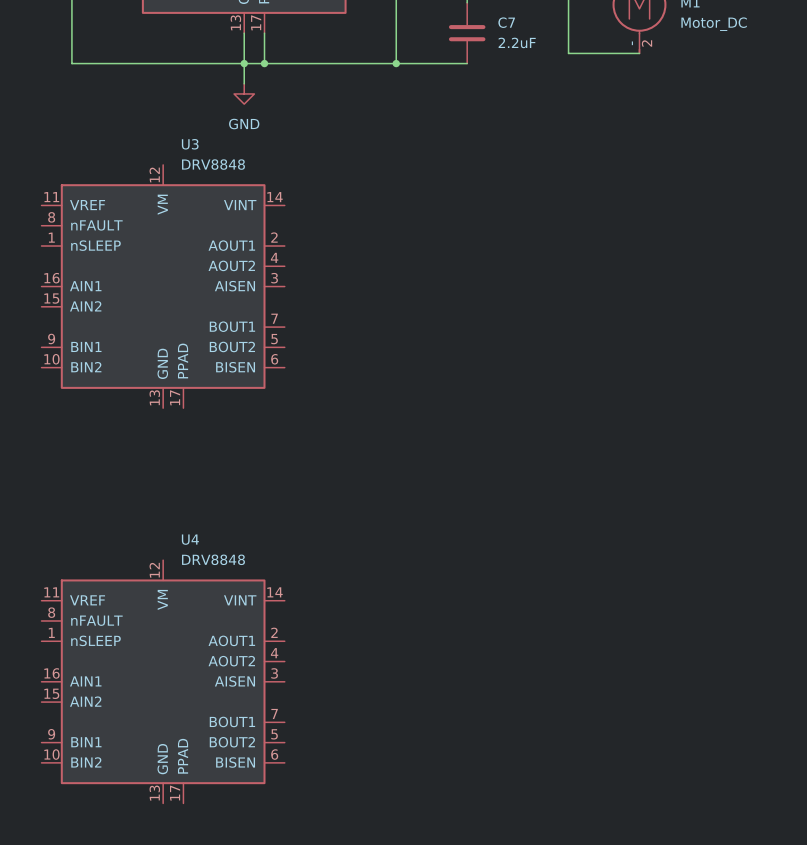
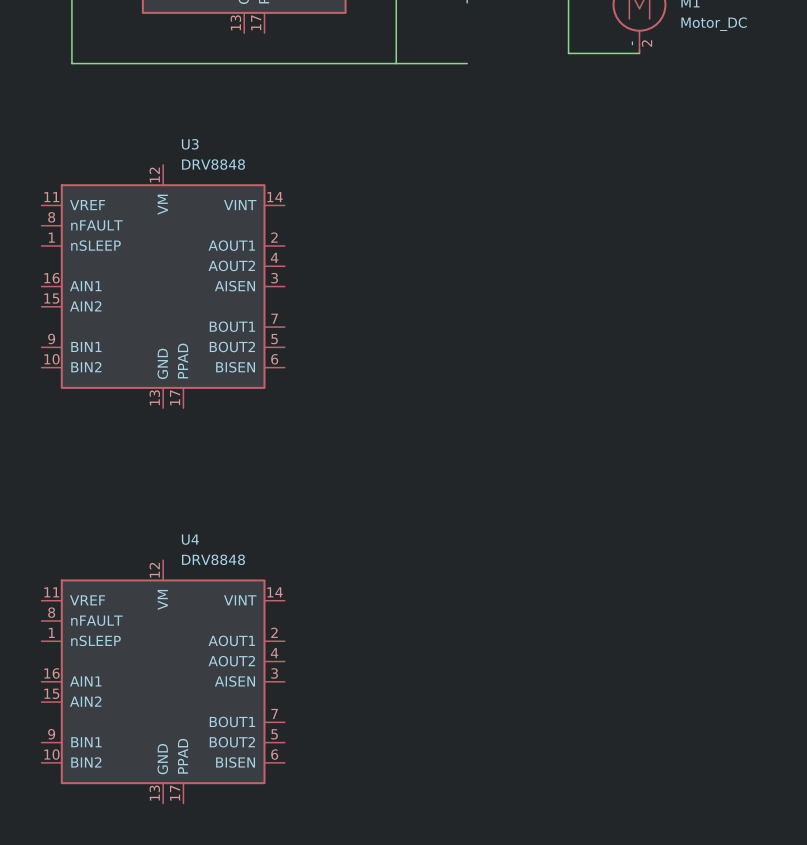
wire: (244, 33) (244, 83) -> none
wire: (264, 33) (264, 63) -> none
C7: 2.2uF (467, 33) -> none
junction: (244, 63) -> none
junction: (264, 63) -> none
junction: (396, 63) -> none
power symbol: GND (244, 93) -> none

